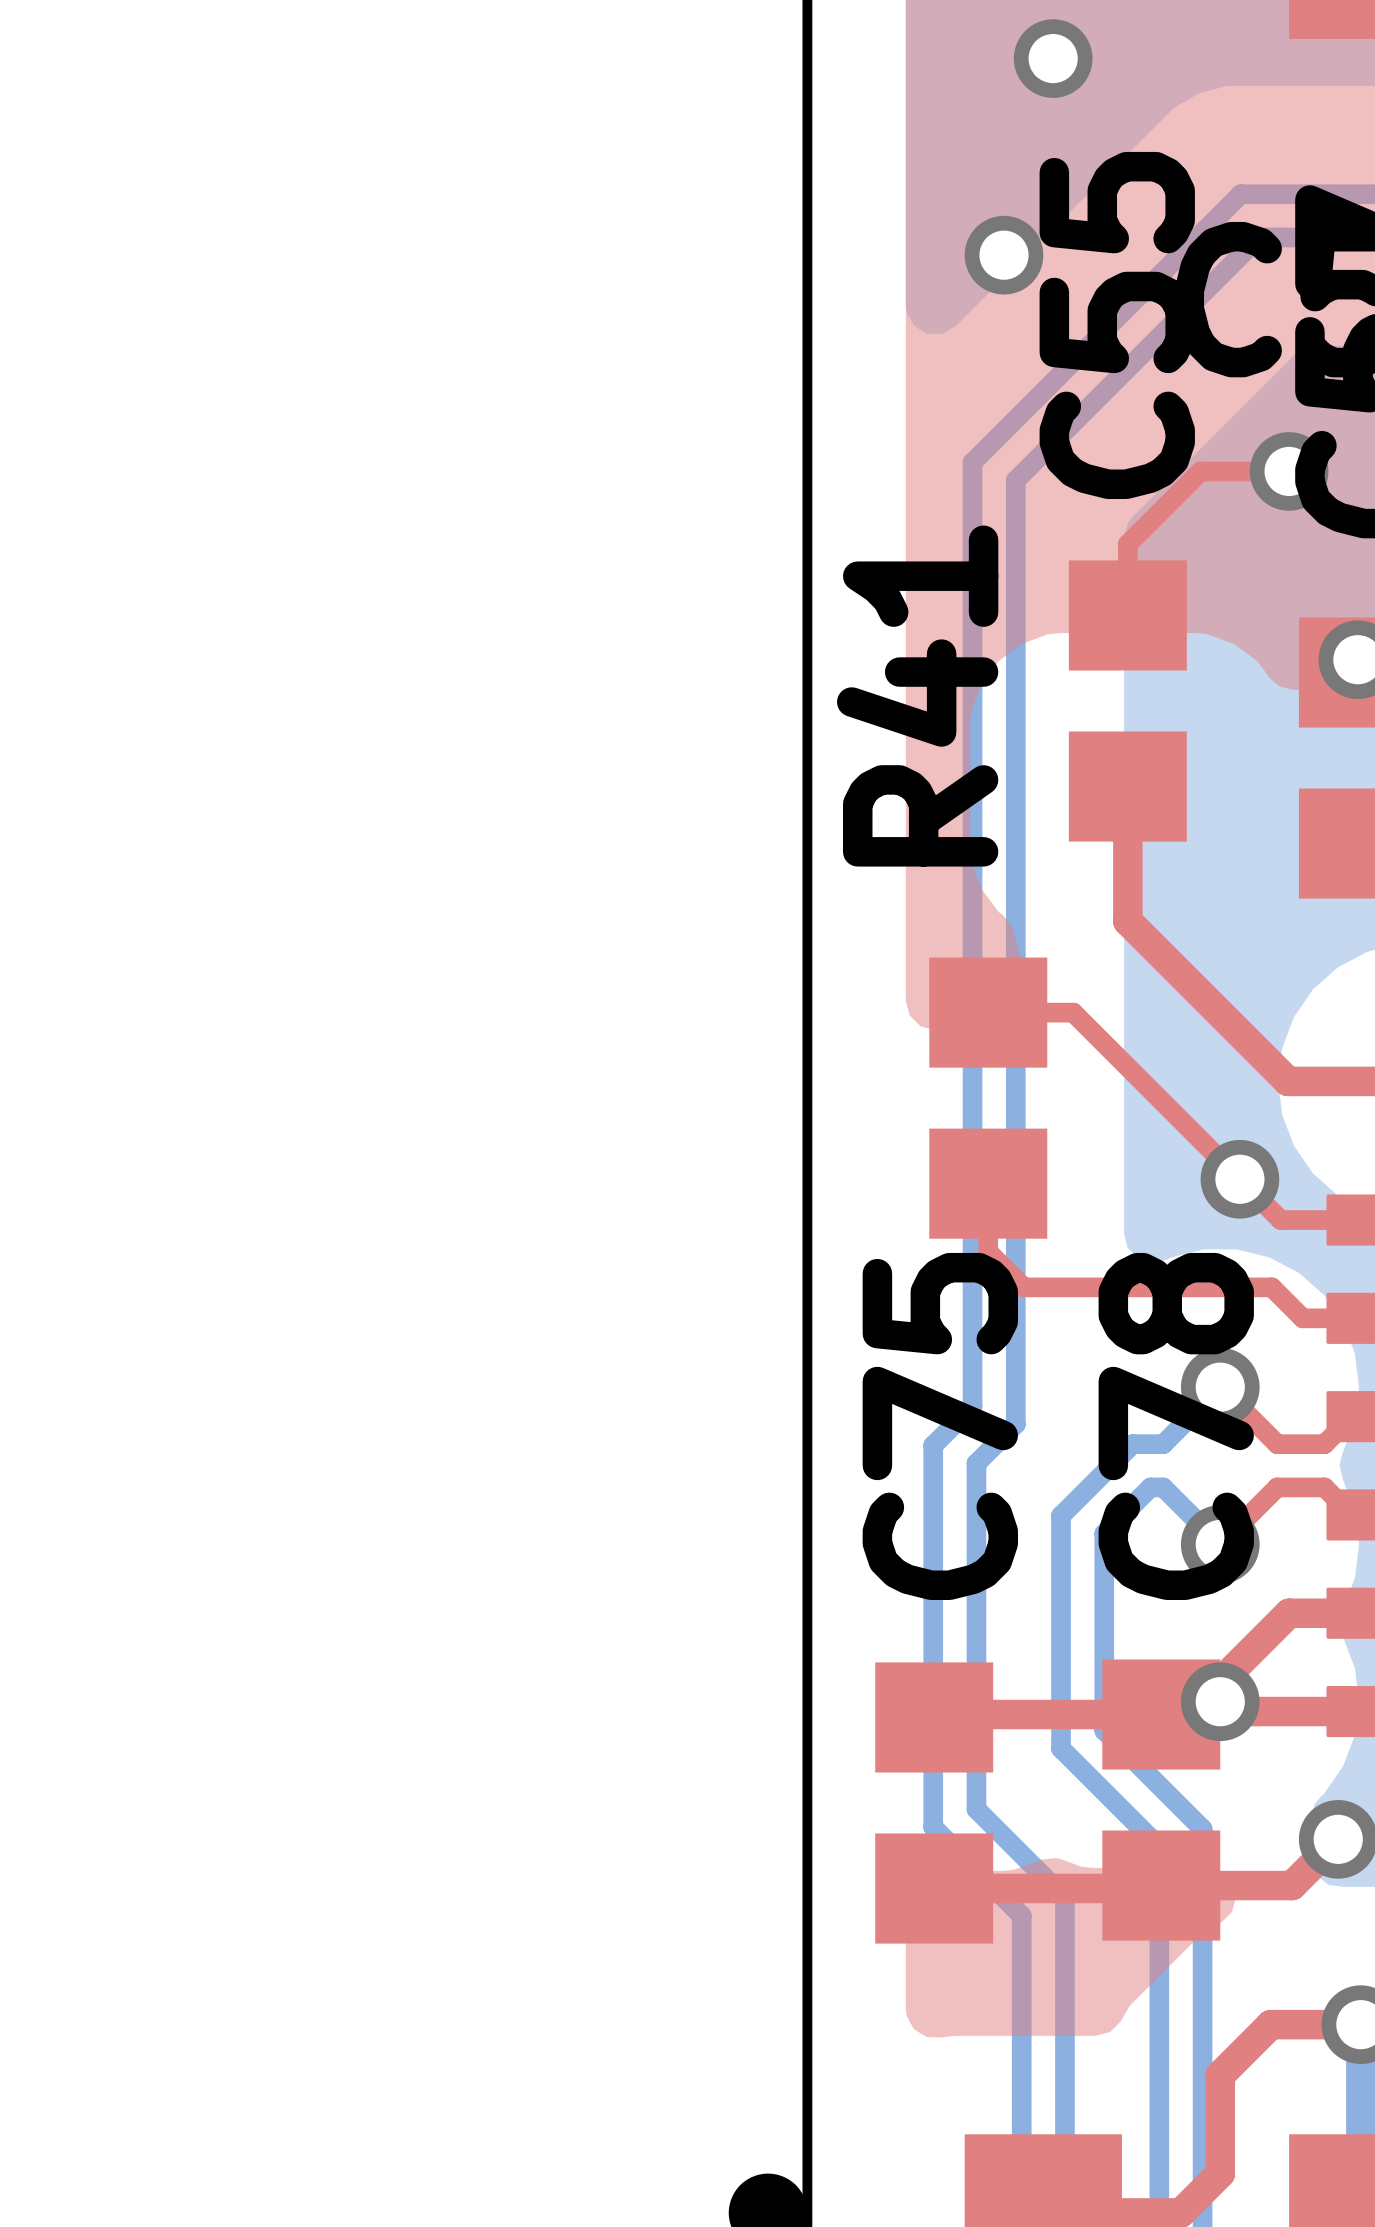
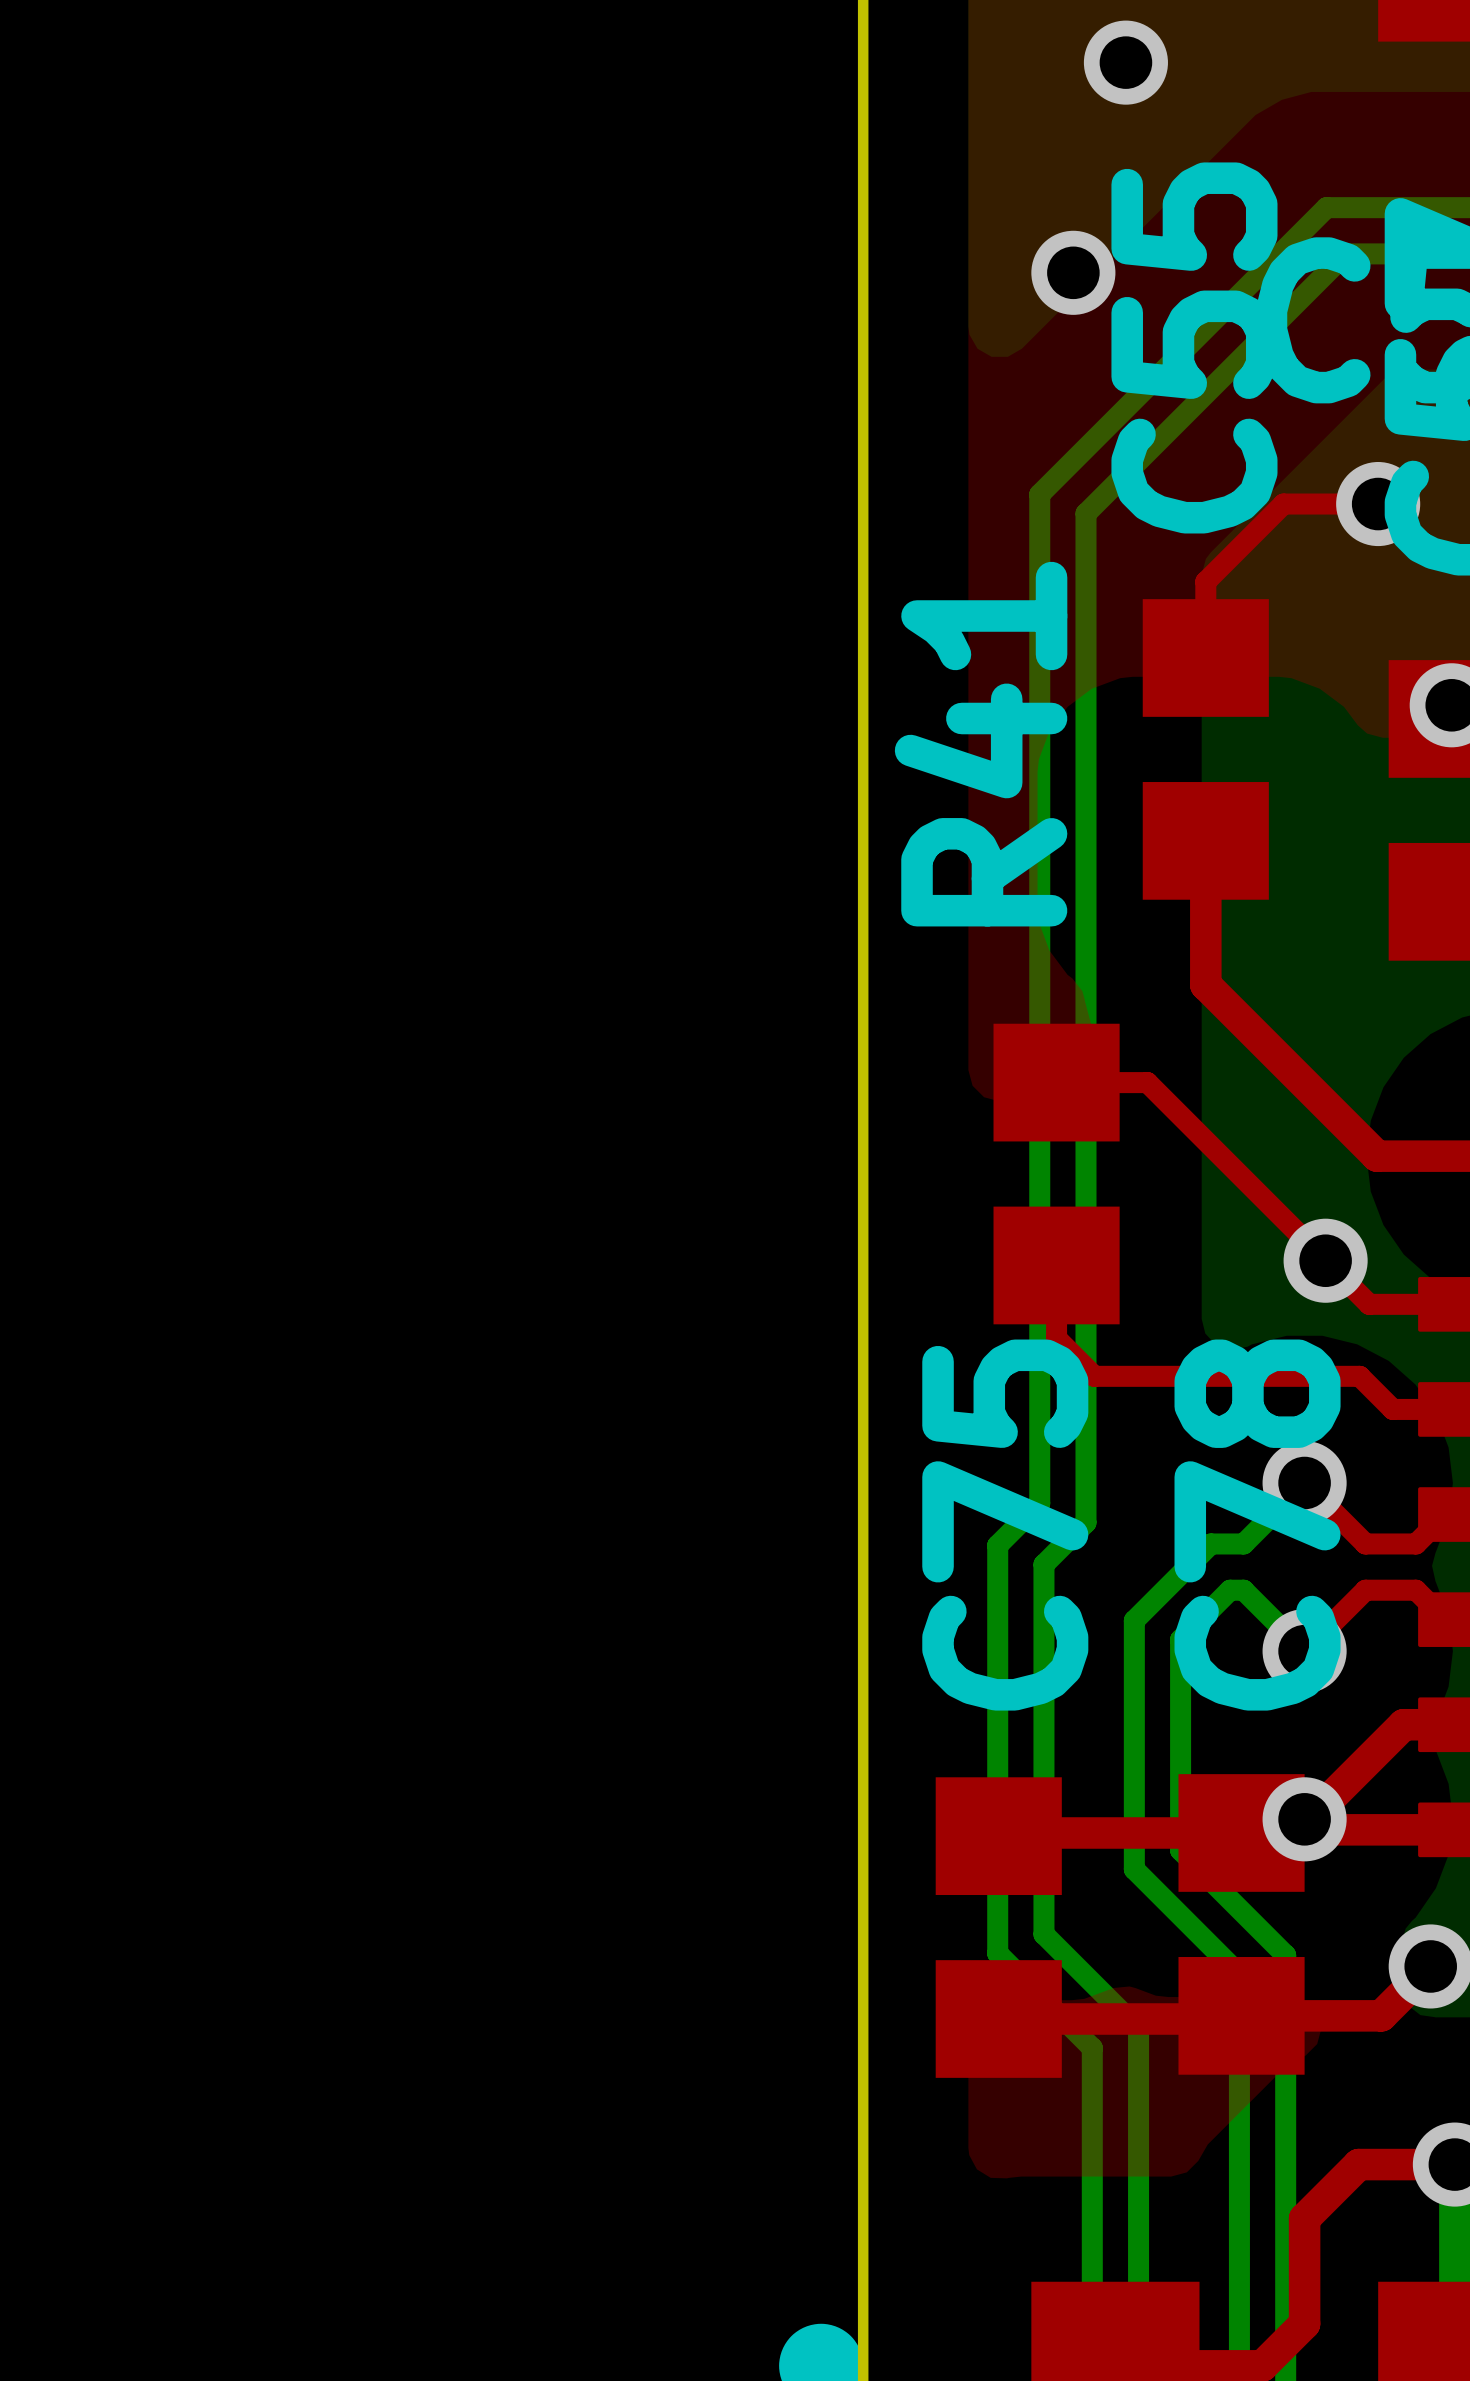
top track: (1312, 1613) (1289, 1613) (1187, 1714) -> (1403, 1724) (1295, 1832) (1290, 1832)

